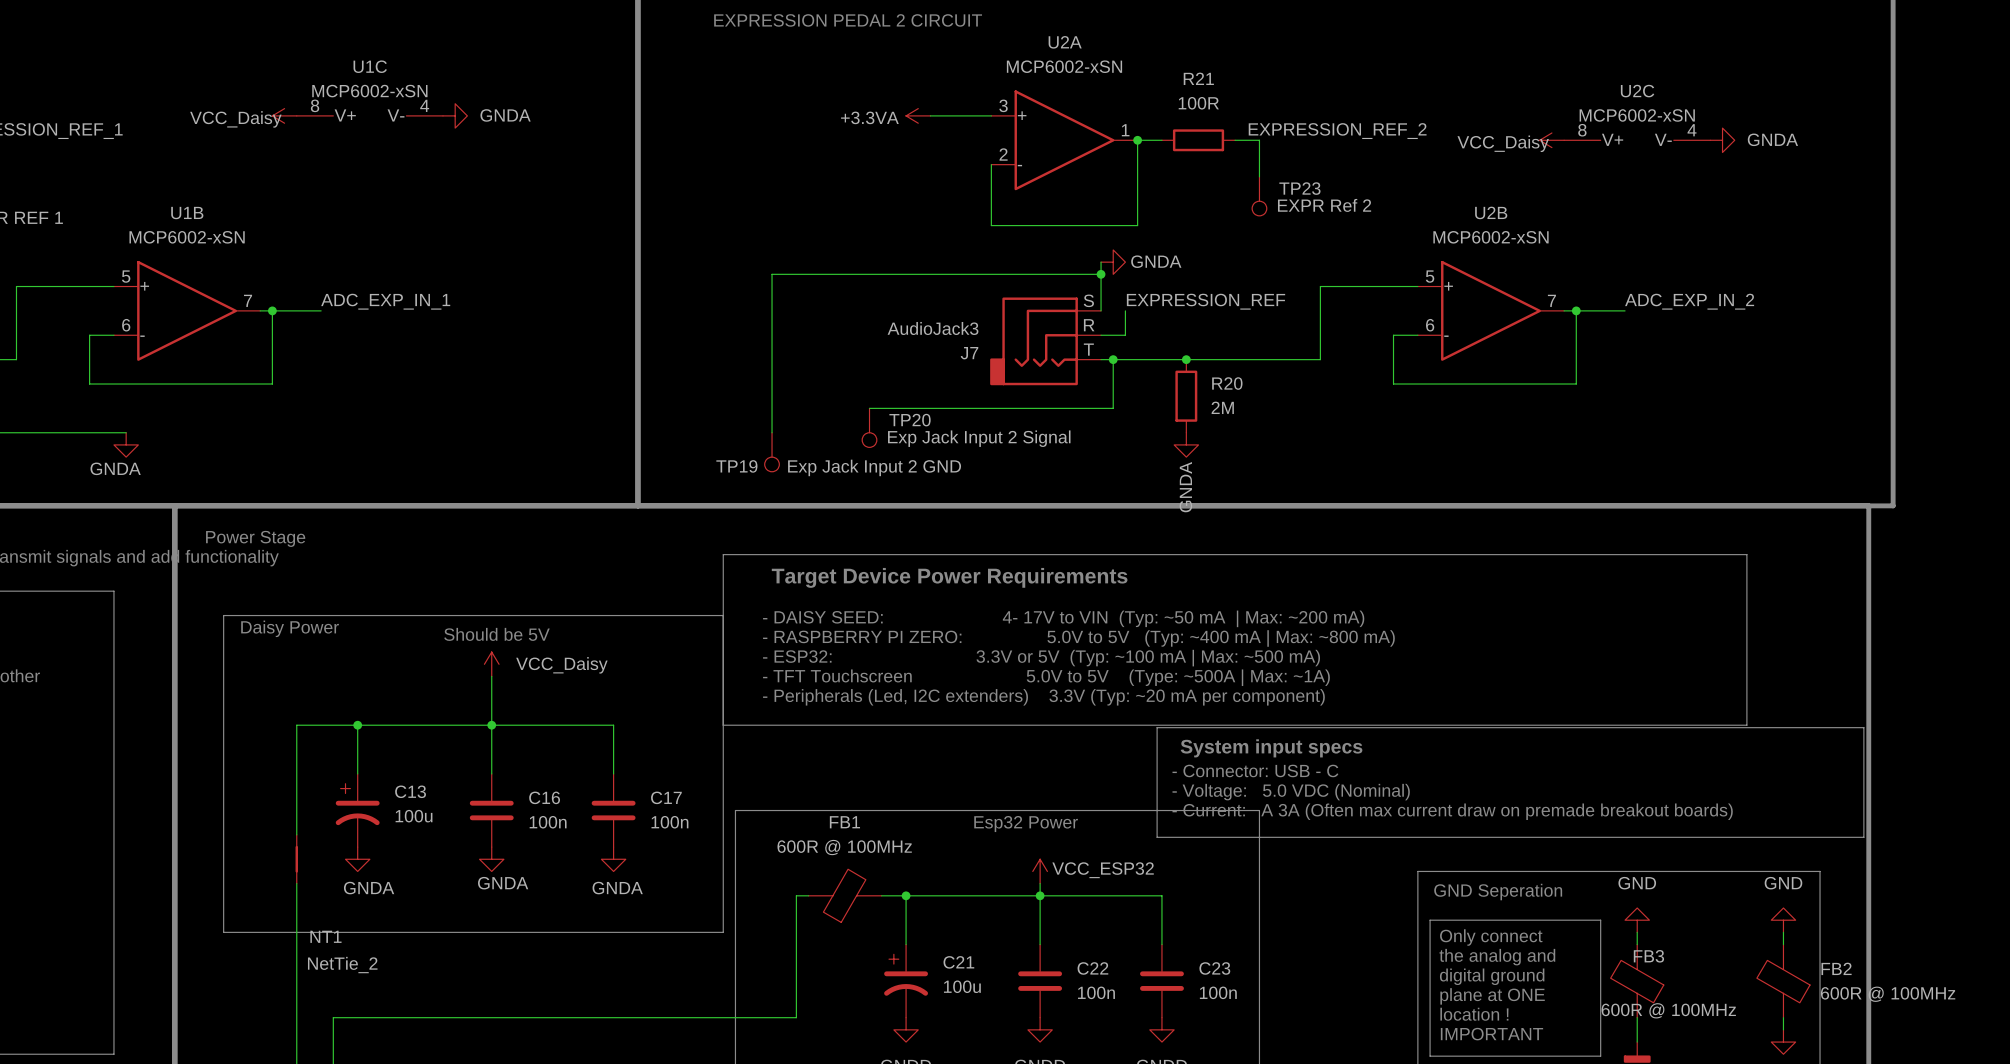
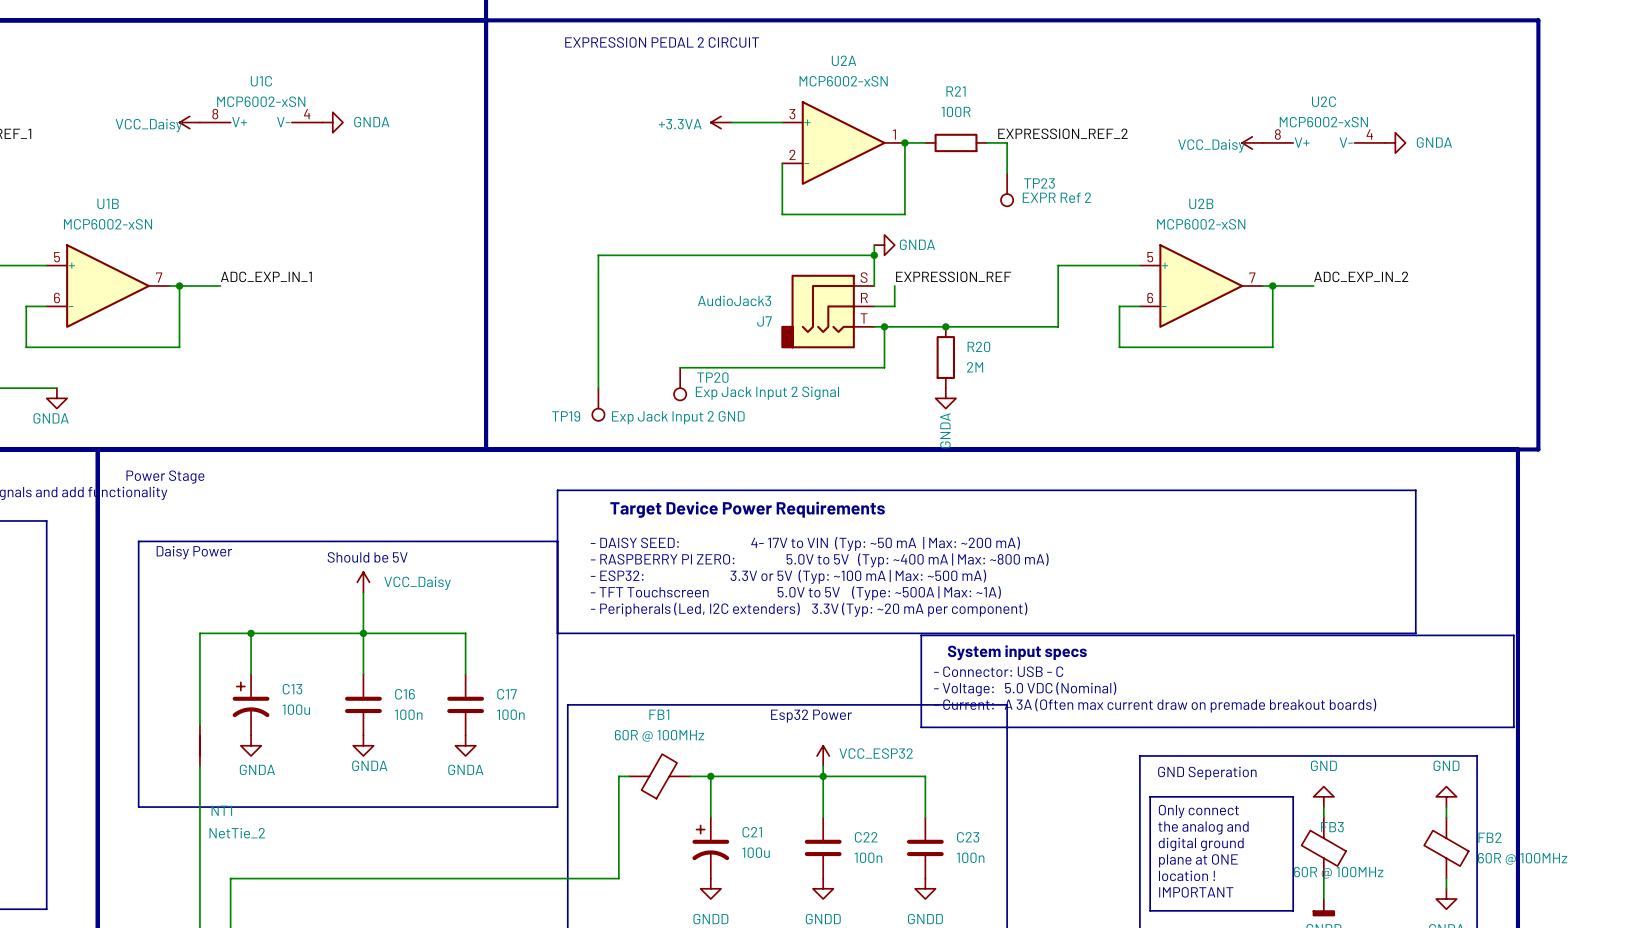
FB1 value: 600R @ 100MHz (844, 847) -> 60R @ 100MHz (659, 735)
FB2 value: 600R @ 100MHz (1888, 994) -> 60R @ 100MHz (1522, 858)
FB3 value: 600R @ 100MHz (1668, 1010) -> 60R @ 100MHz (1338, 872)

